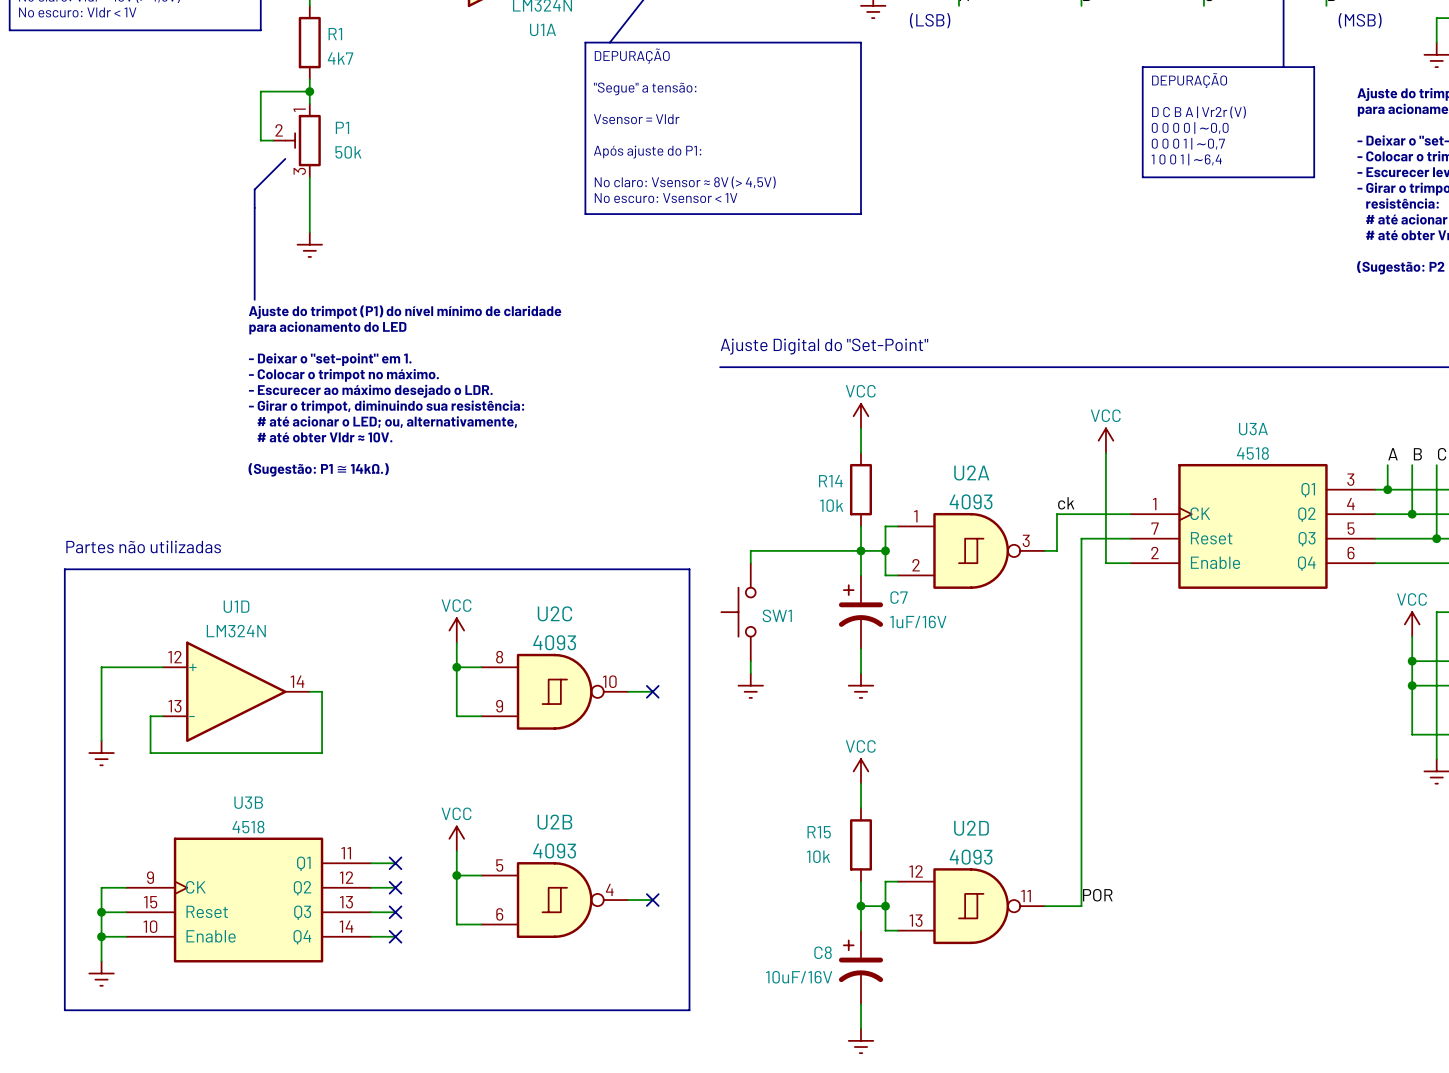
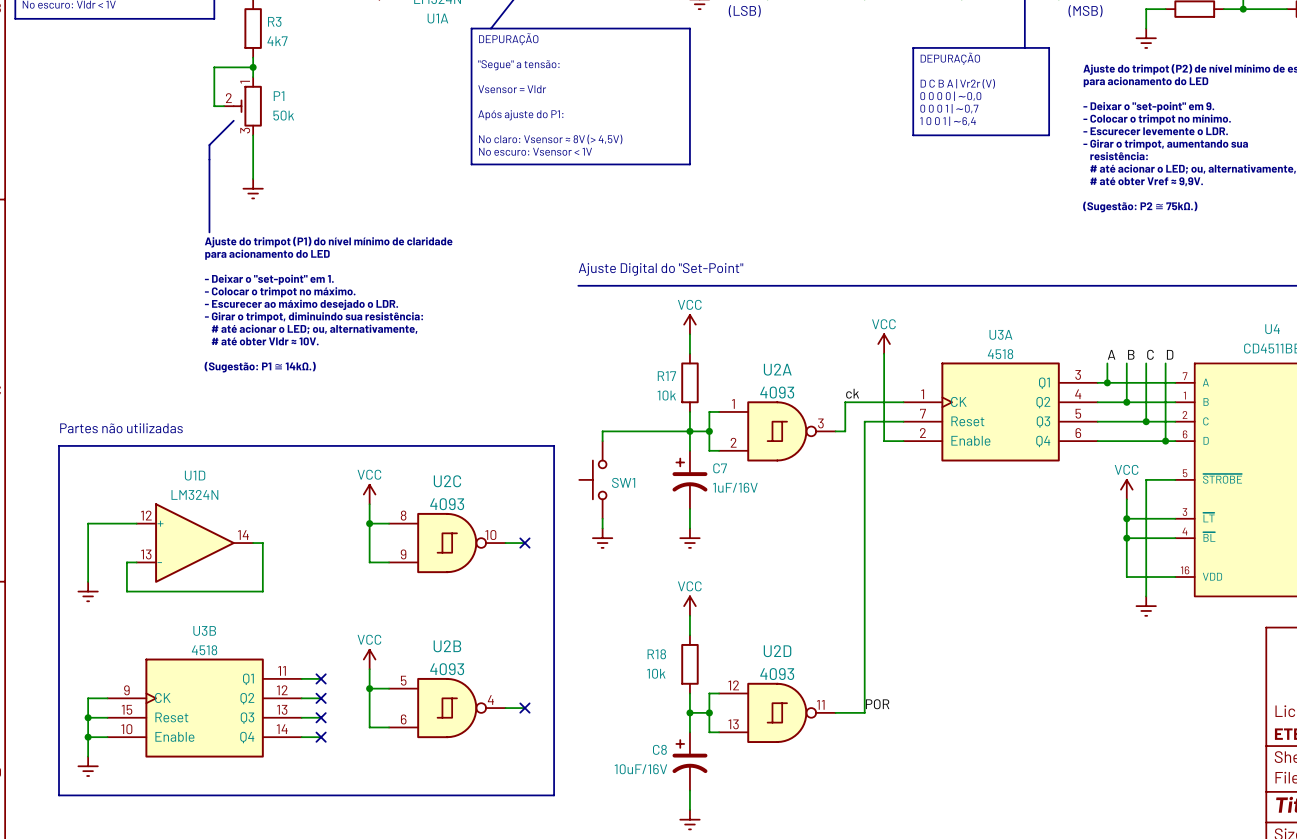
R1 name: R1 (335, 34) -> R3 (274, 21)
R14 name: R14 (830, 481) -> R17 (666, 376)
R15 name: R15 (819, 832) -> R18 (656, 654)

